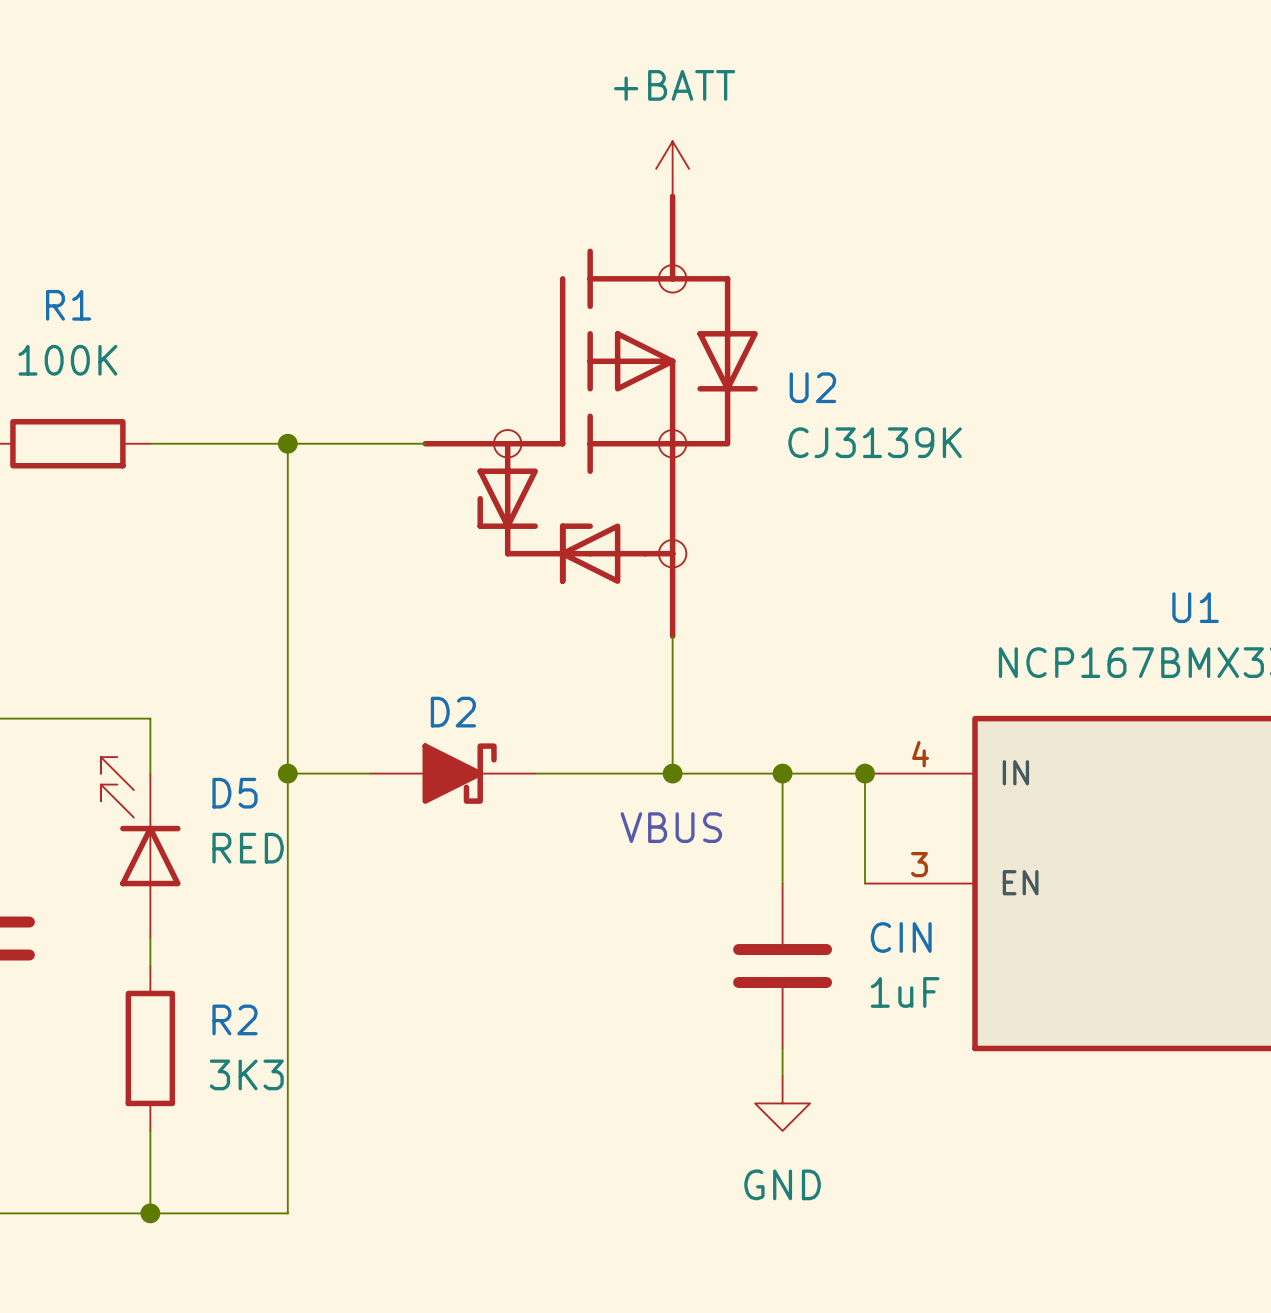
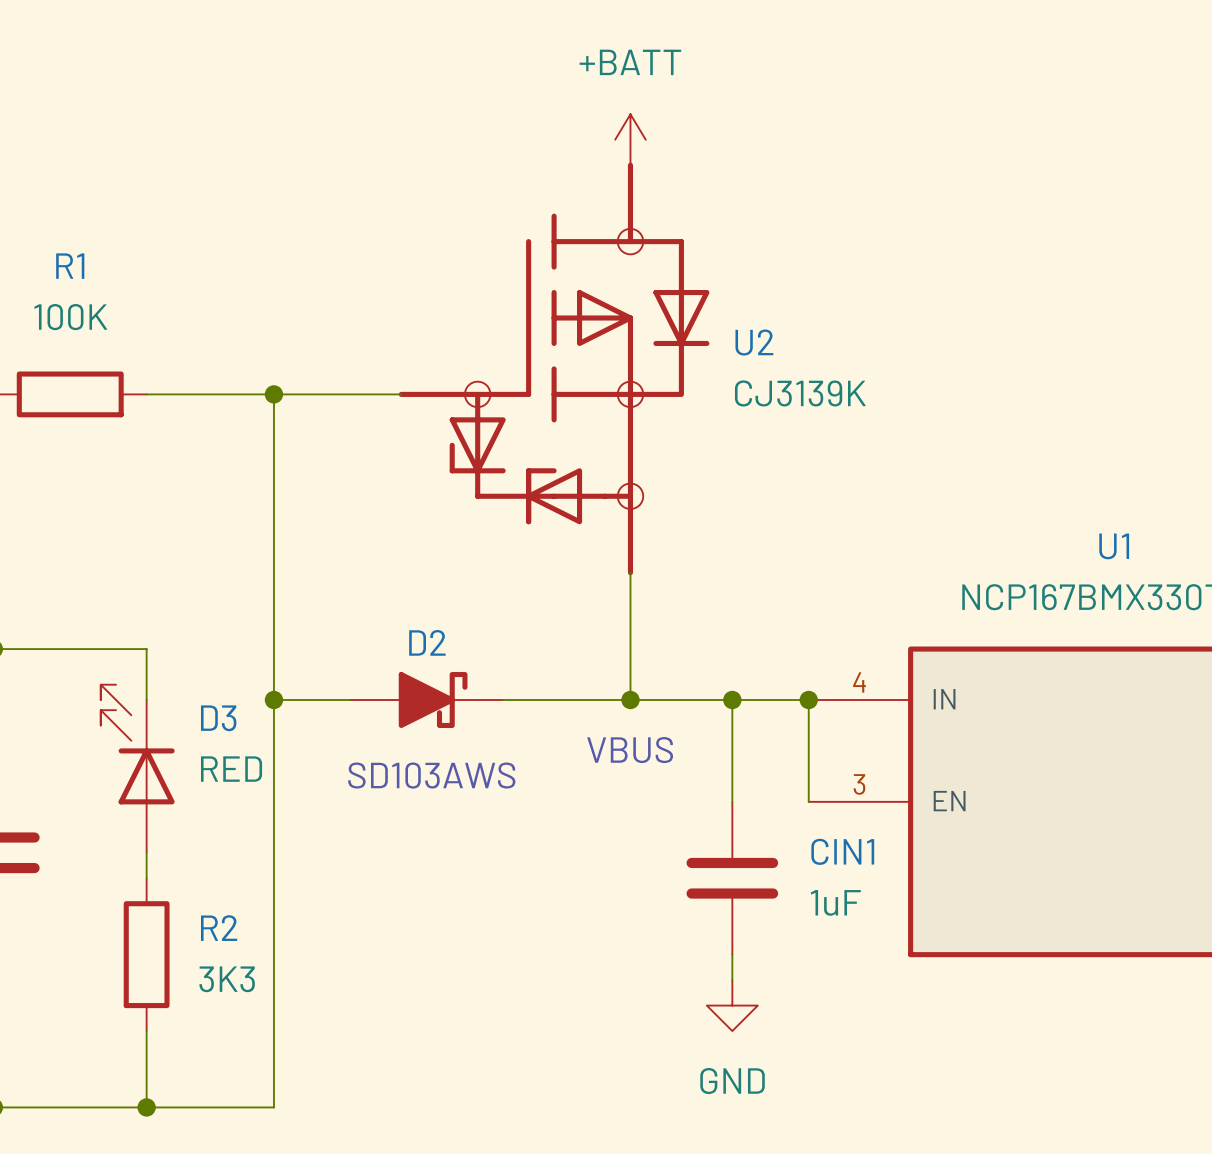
D5 name: D5 (235, 793) -> D3 (218, 718)
text: none -> SD103AWS (431, 775)
CIN name: CIN (901, 937) -> CIN1 (842, 851)

